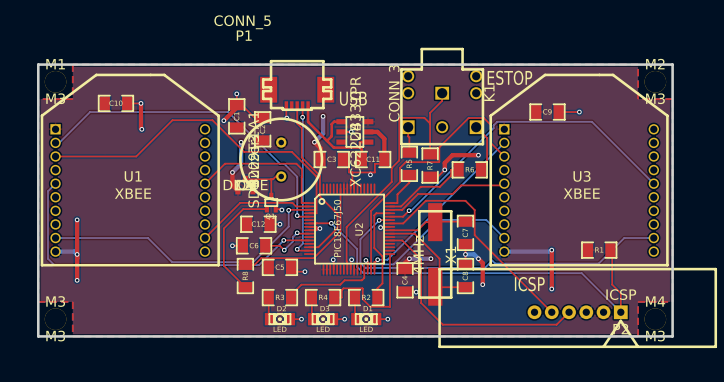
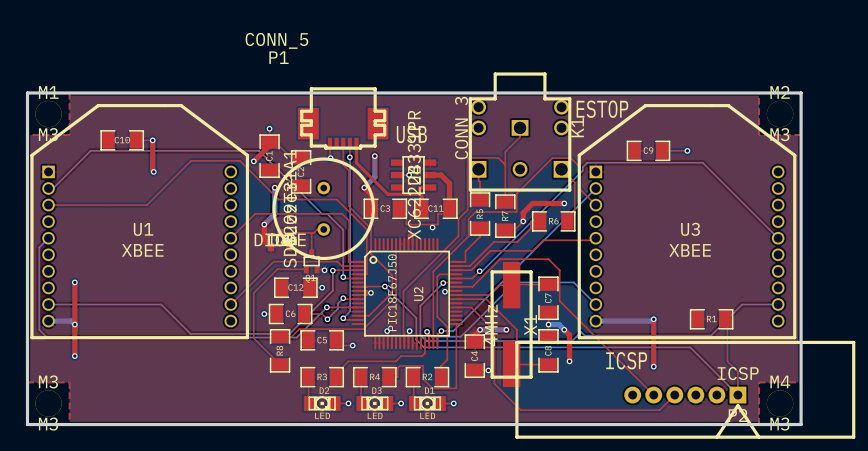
top track: (341, 121) (334, 121) (331, 124) (331, 136) (327, 140) -> none

